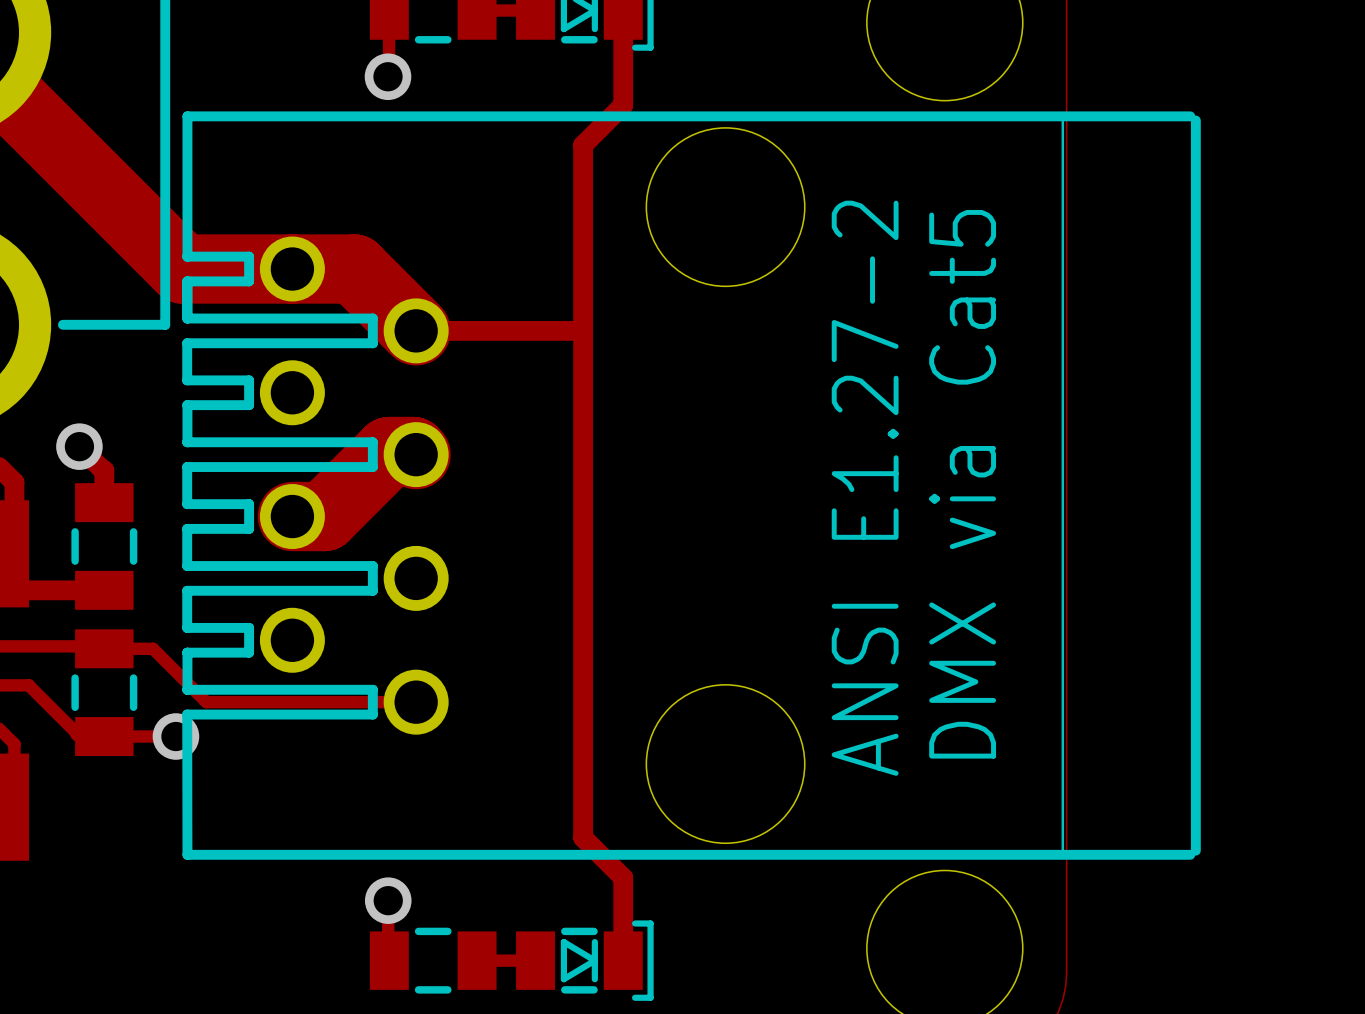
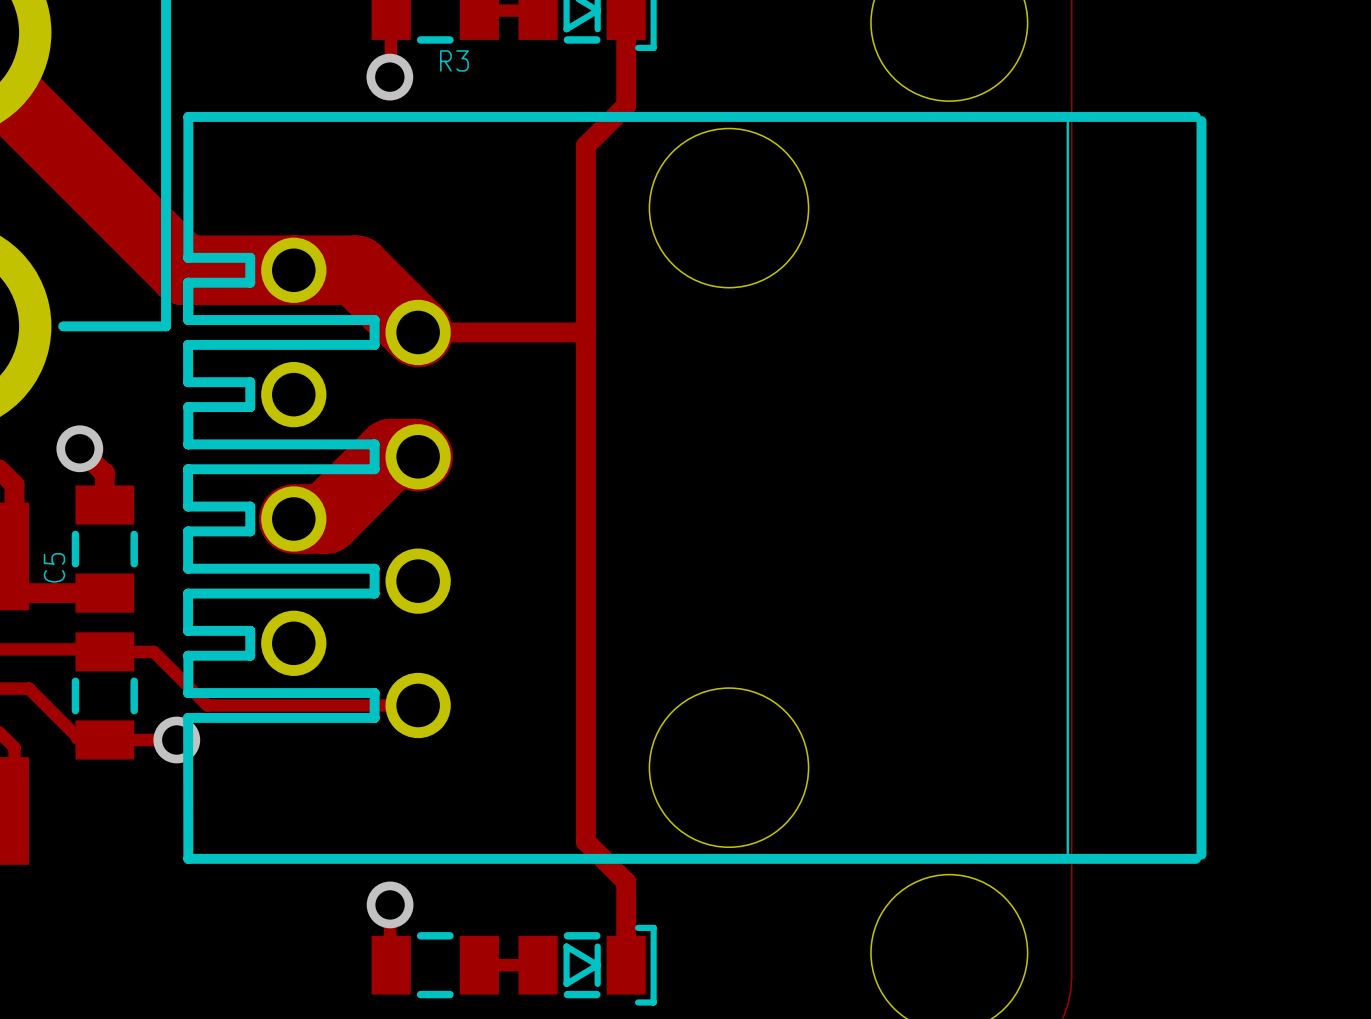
R3 name: none -> R3 (454, 60)
text: DMX via Cat5 (962, 484) -> none
text: ANSI E1.27-2 (865, 488) -> none
C5 name: none -> C5 (54, 567)

